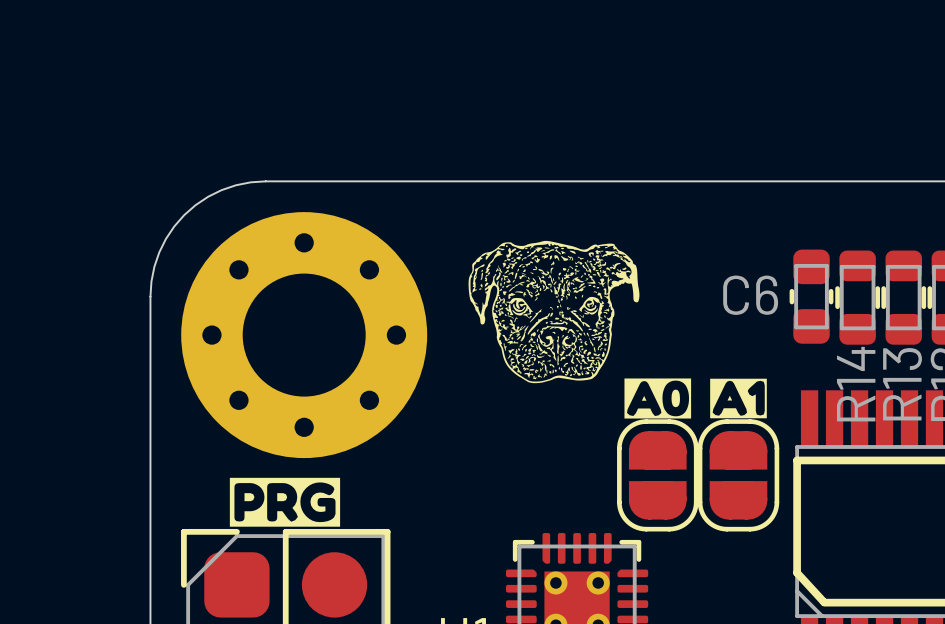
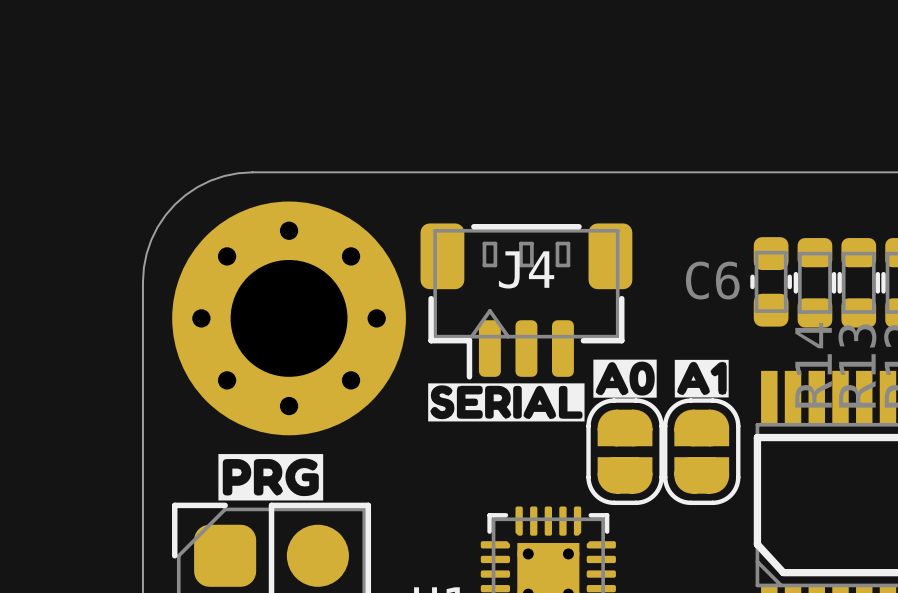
drawing: [468, 240, 640, 384] -> none
J4: none -> (526, 301)
drawing: none -> [428, 383, 585, 422]

